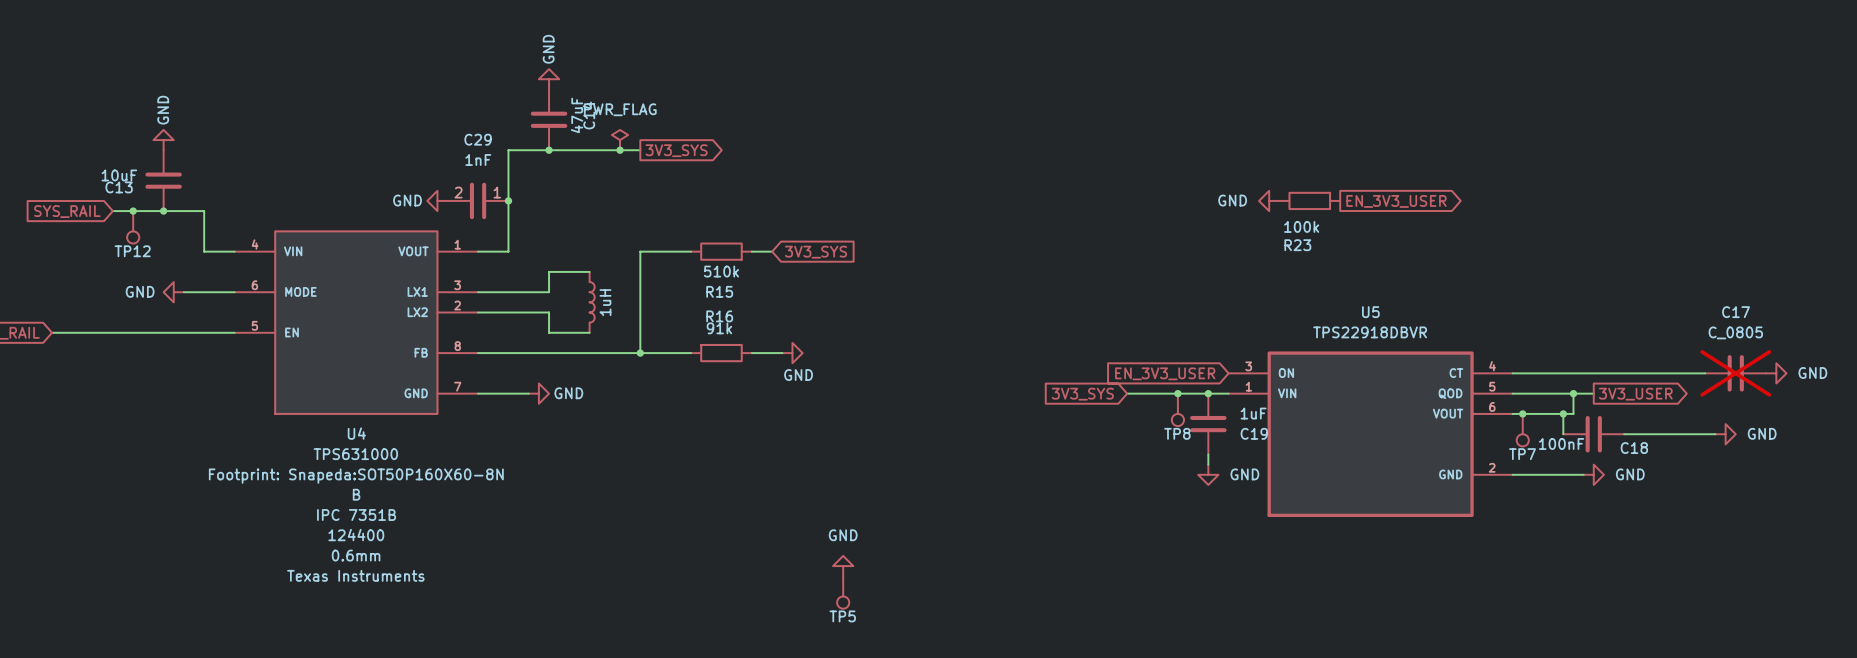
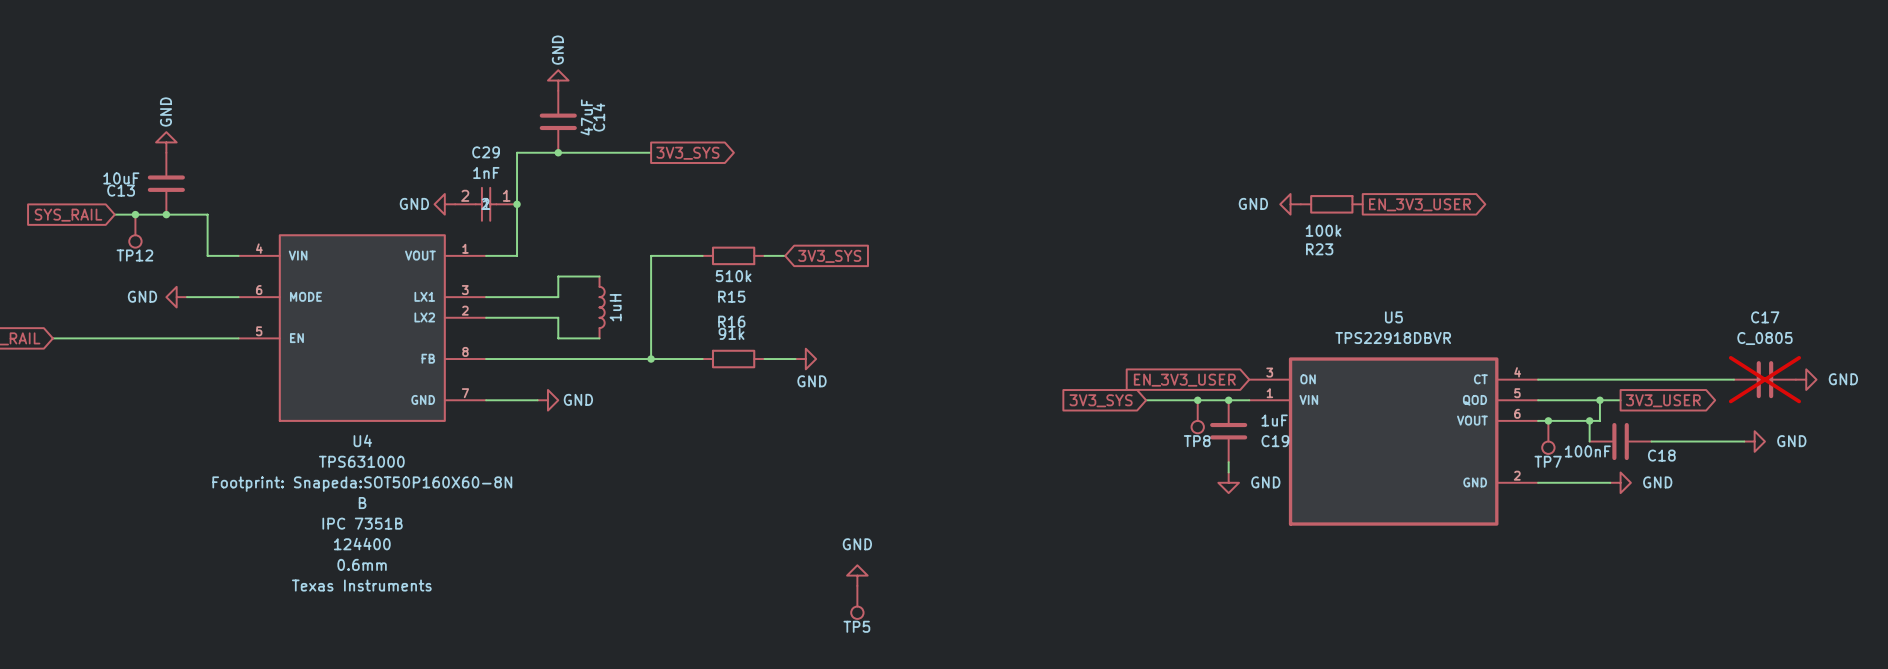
power symbol: PWR_FLAG (620, 140) -> none
junction: (620, 150) -> none
C29 symbol: [447, 182, 509, 220] -> [455, 187, 518, 221]

